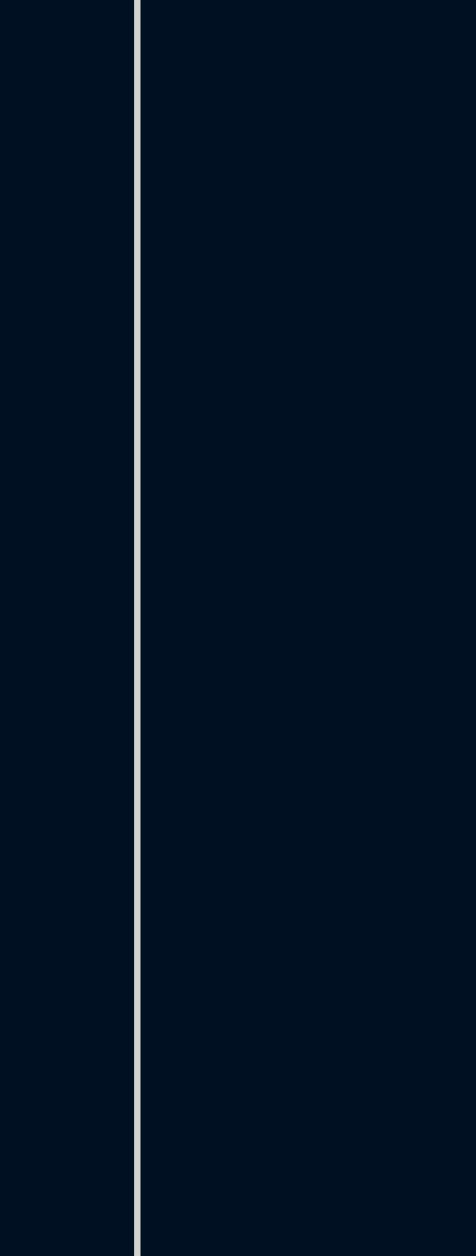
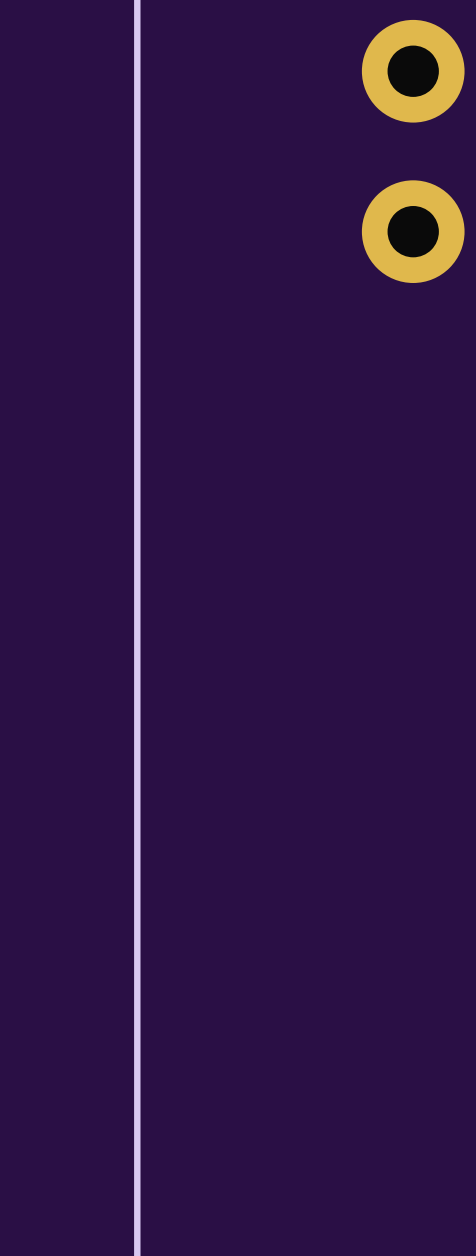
part: none -> (413, 151)

